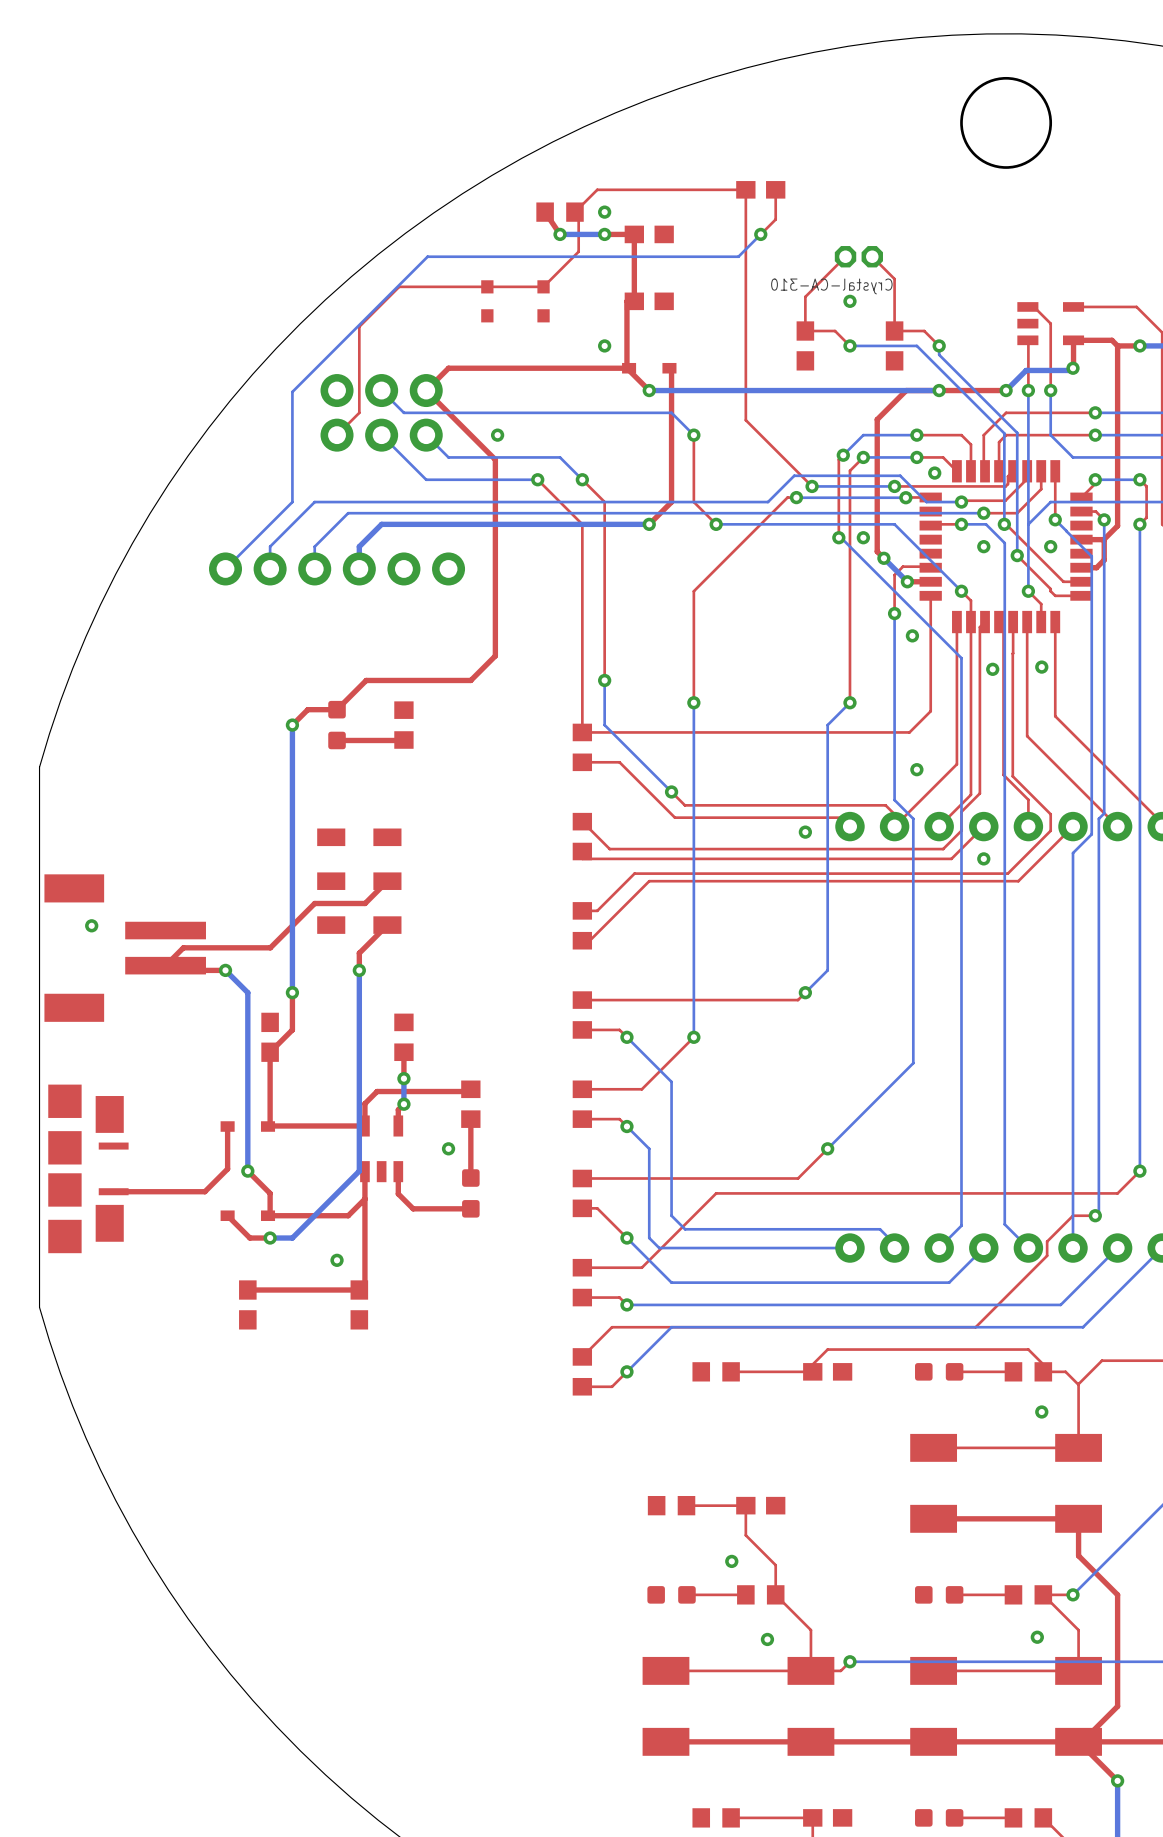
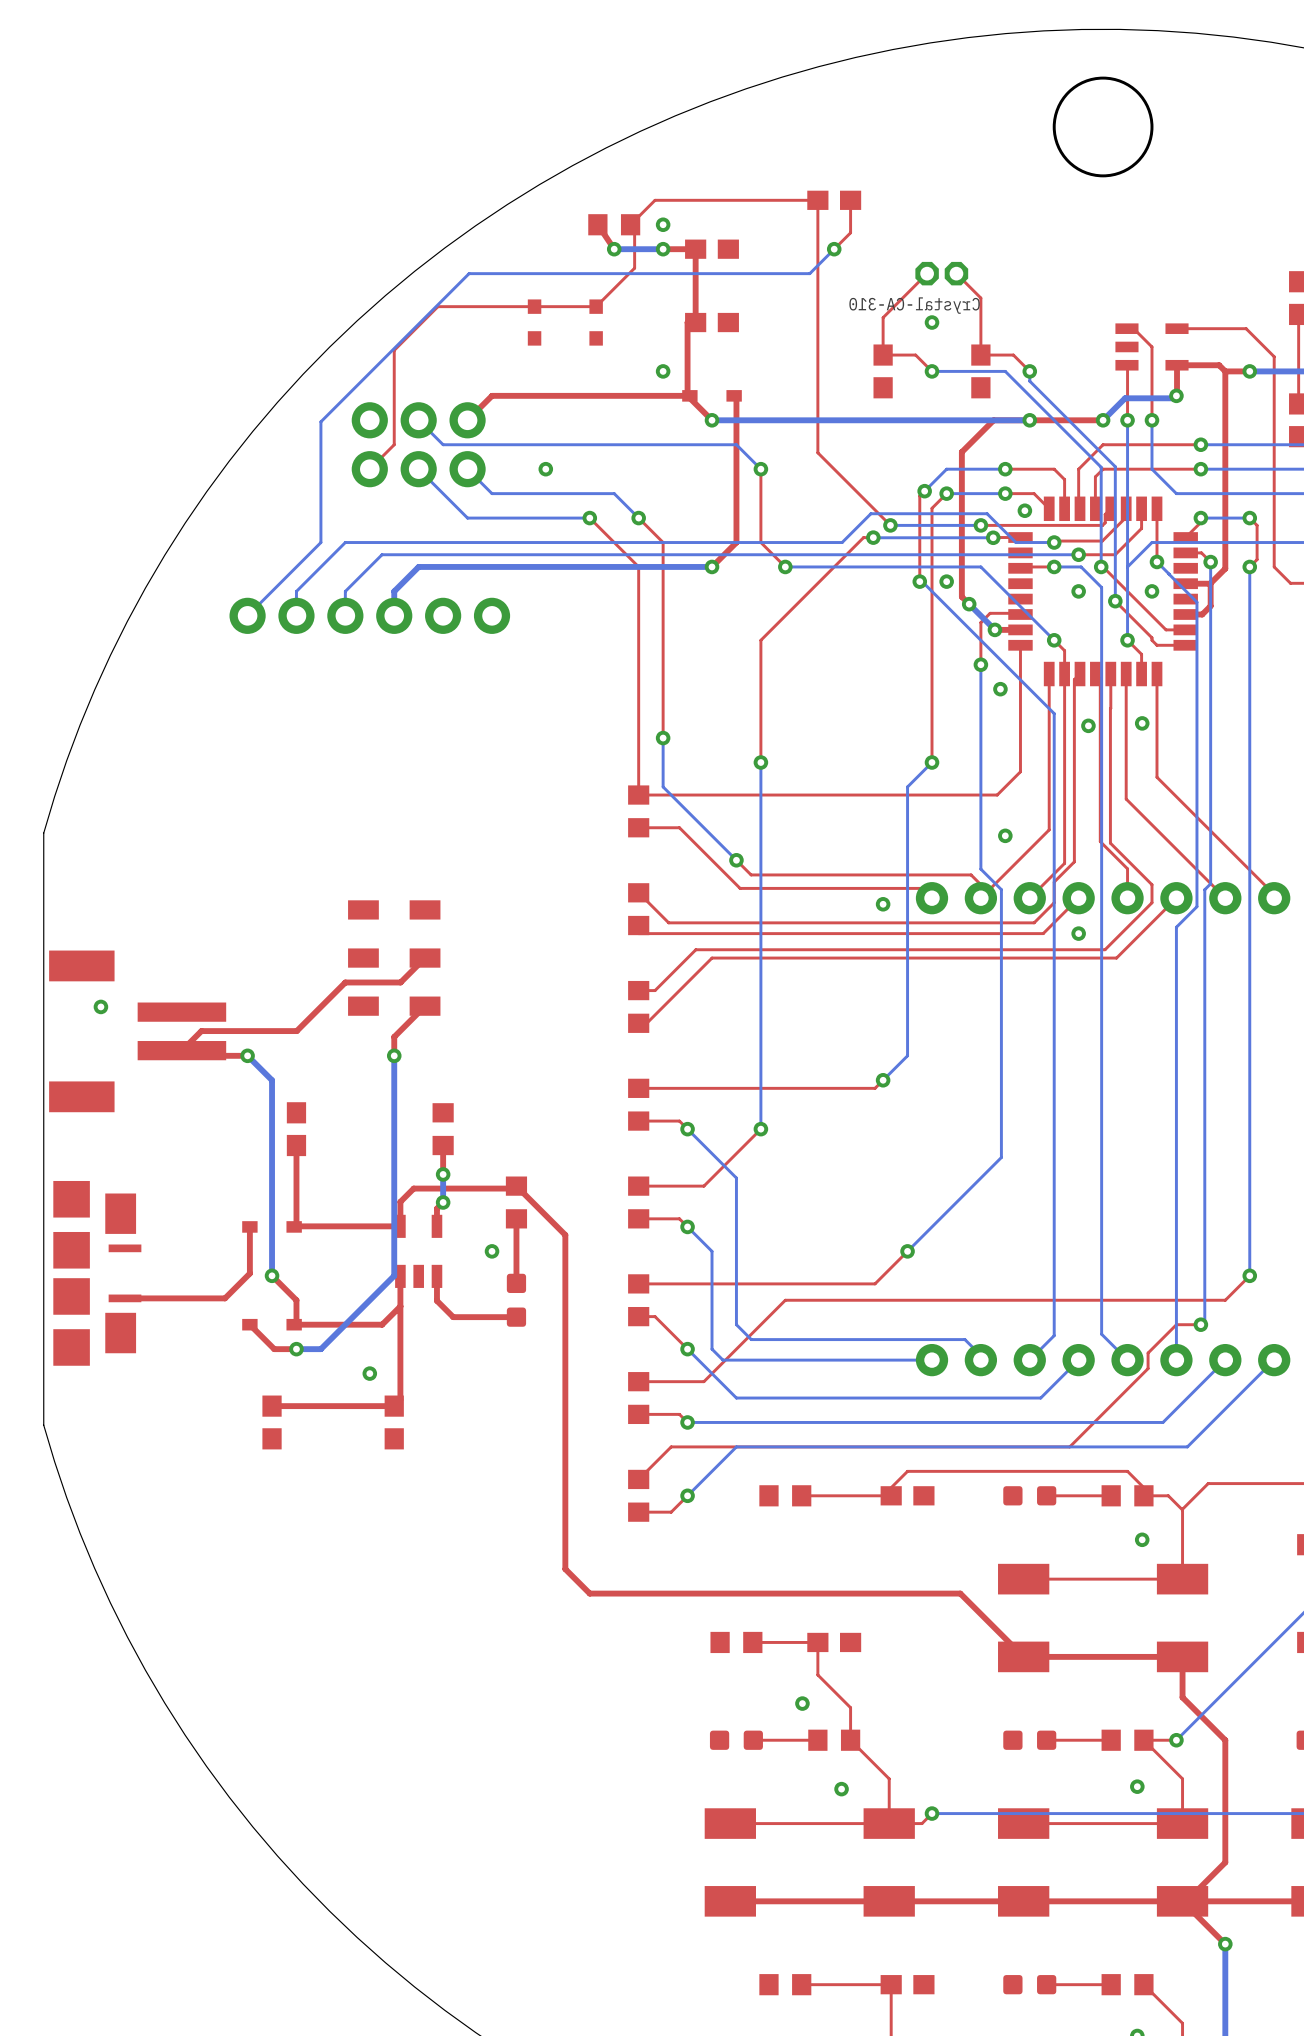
top track: (426, 390) (495, 459) (495, 655) (470, 680) (366, 680) (337, 709) (307, 709) (292, 725) -> none
bottom track: (292, 725) (292, 992) -> none
via: (292, 725) -> none
part: (337, 725) -> none
part: (403, 725) -> none
top track: (403, 740) (337, 740) -> none
top track: (292, 992) (292, 1029) (270, 1052) -> none
via: (292, 992) -> none
top track: none -> (516, 1186) (565, 1235) (565, 1569) (589, 1593) (960, 1593) (1023, 1656)

